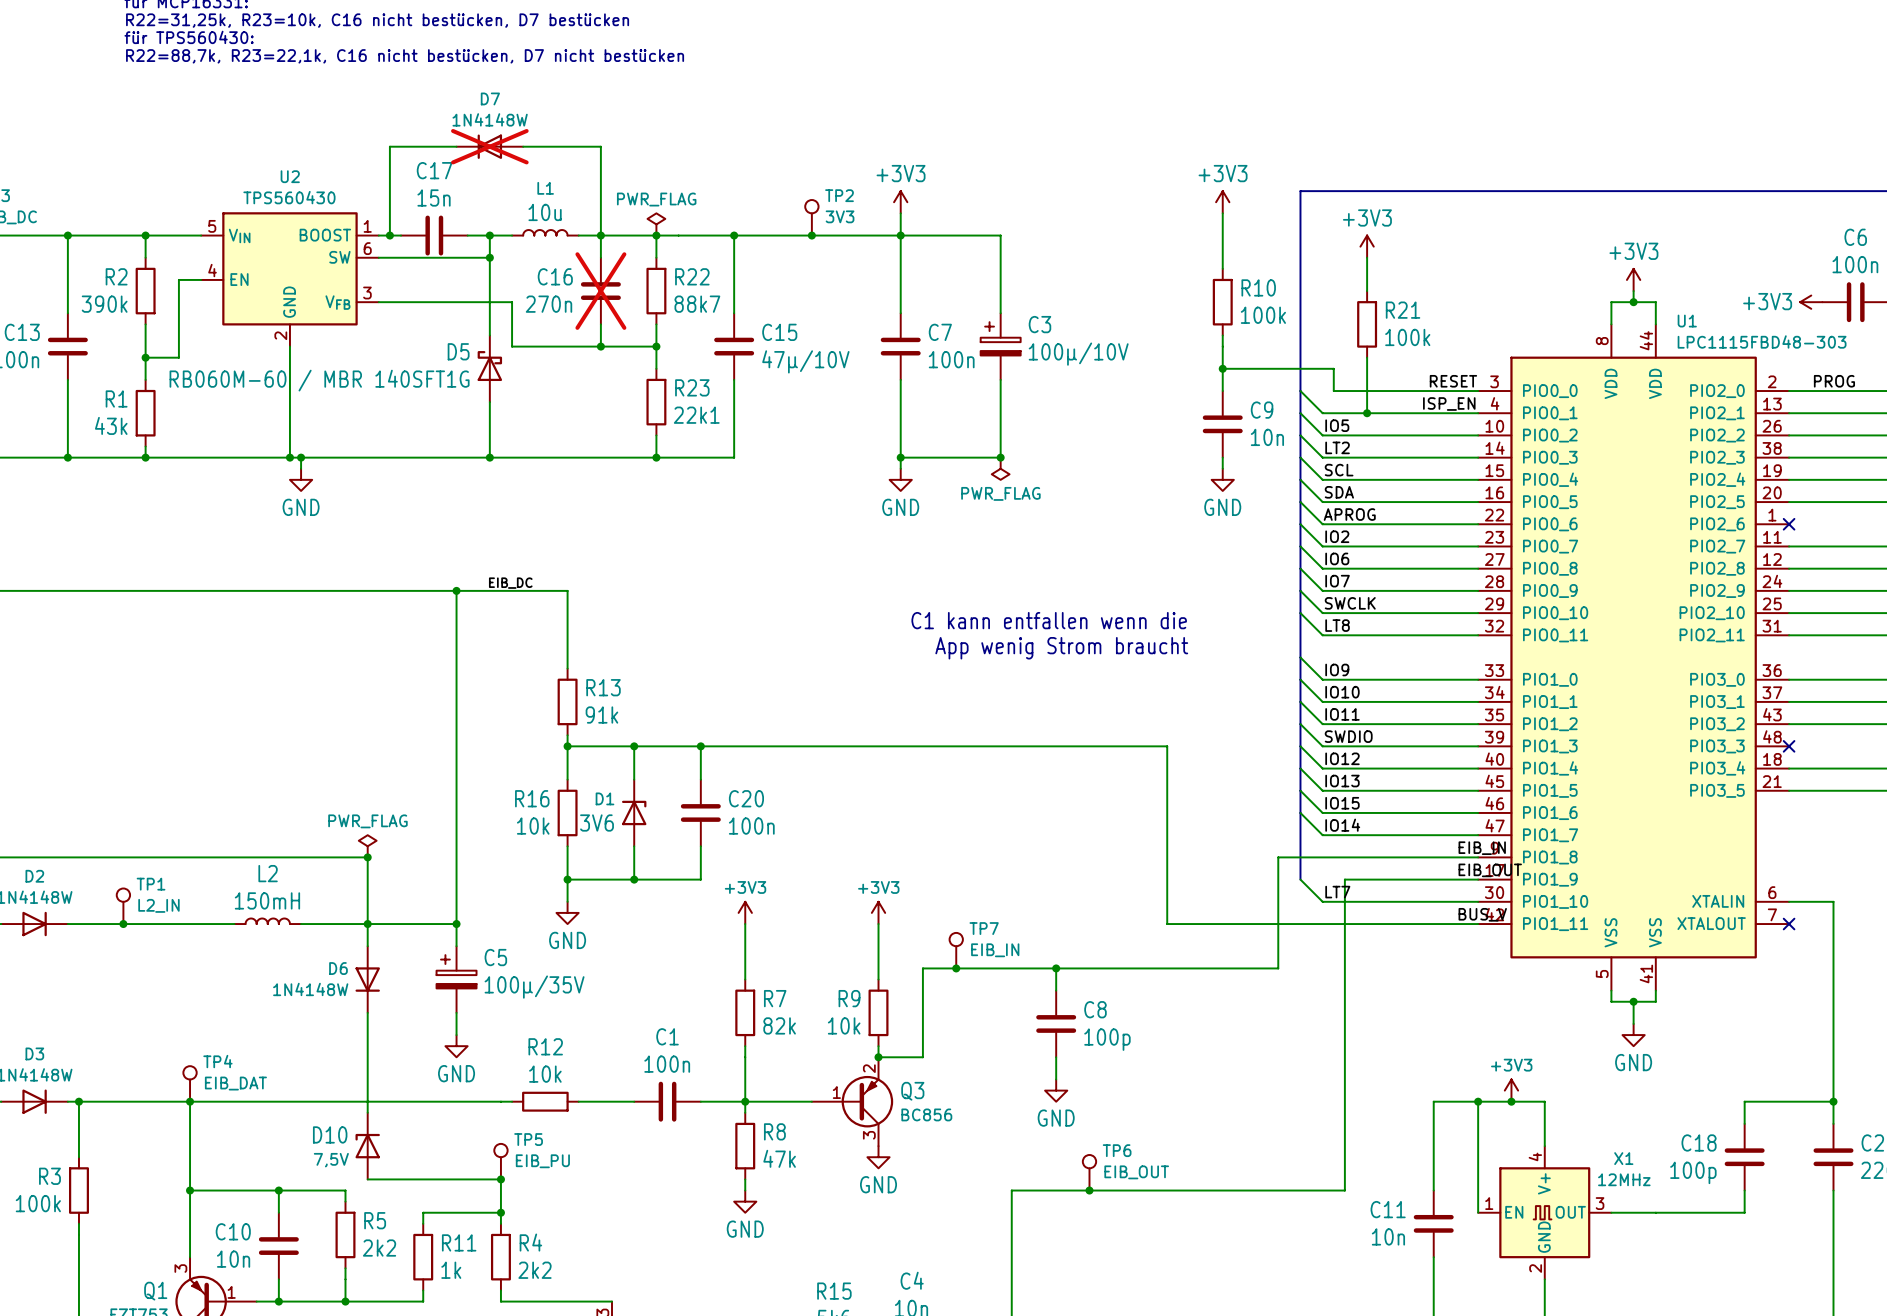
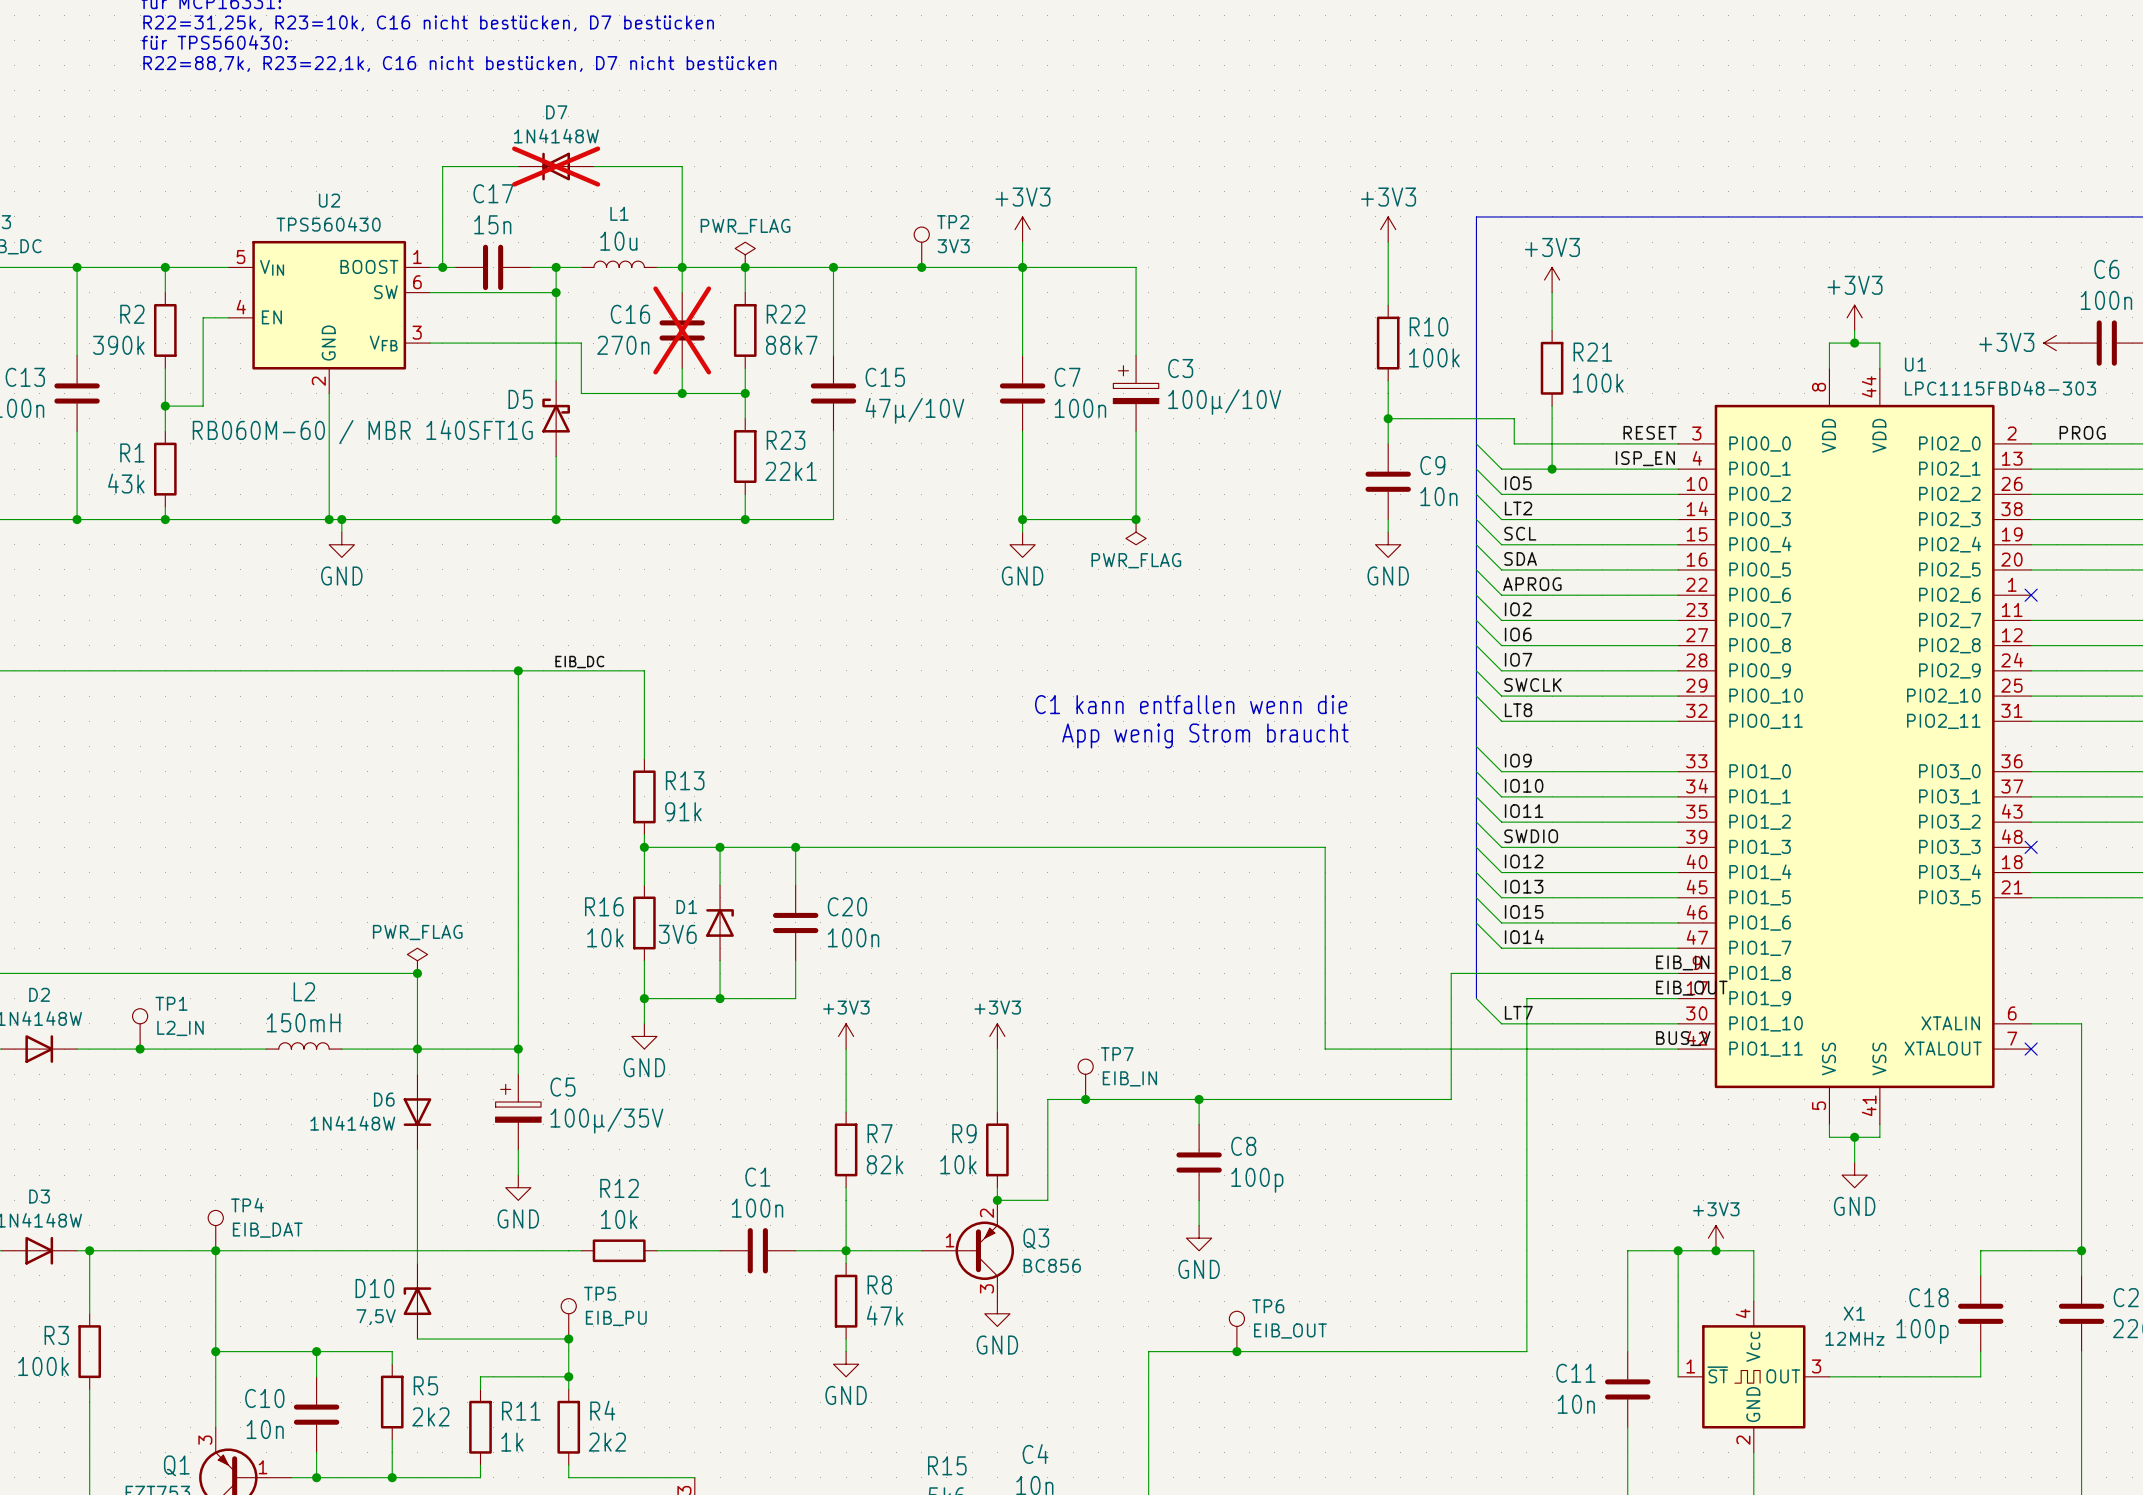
X1 symbol: [1478, 1146, 1612, 1280] -> [1678, 1301, 1830, 1453]

